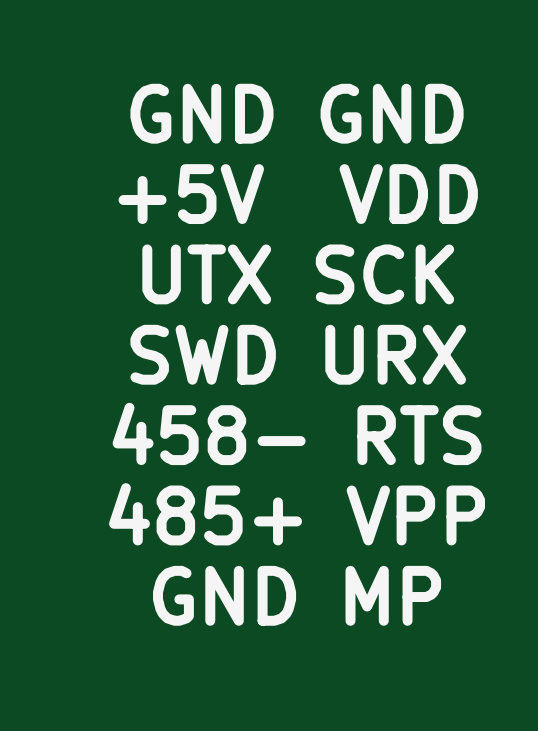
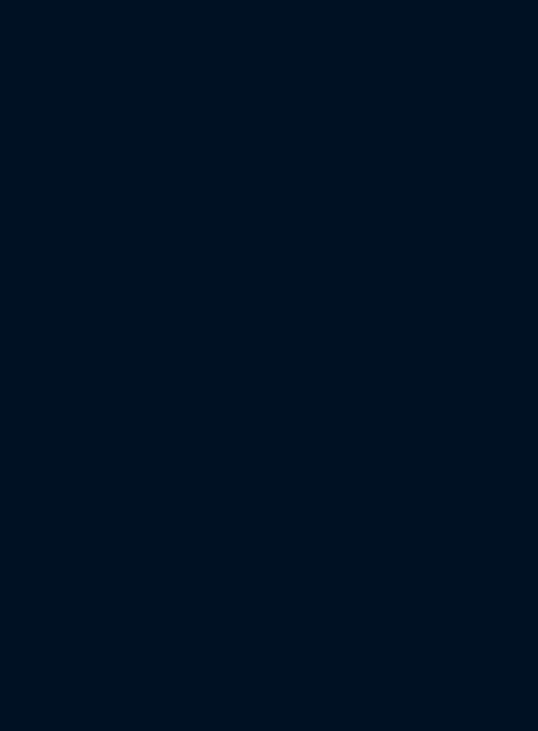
text: GND GND (297, 113) -> none
text: +5V VDD (298, 194) -> none
text: UTX SCK (298, 274) -> none
text: SWD URX (298, 354) -> none
text: 458- RTS (297, 433) -> none
text: 485+ VPP (297, 514) -> none
text: GND MP (297, 595) -> none

